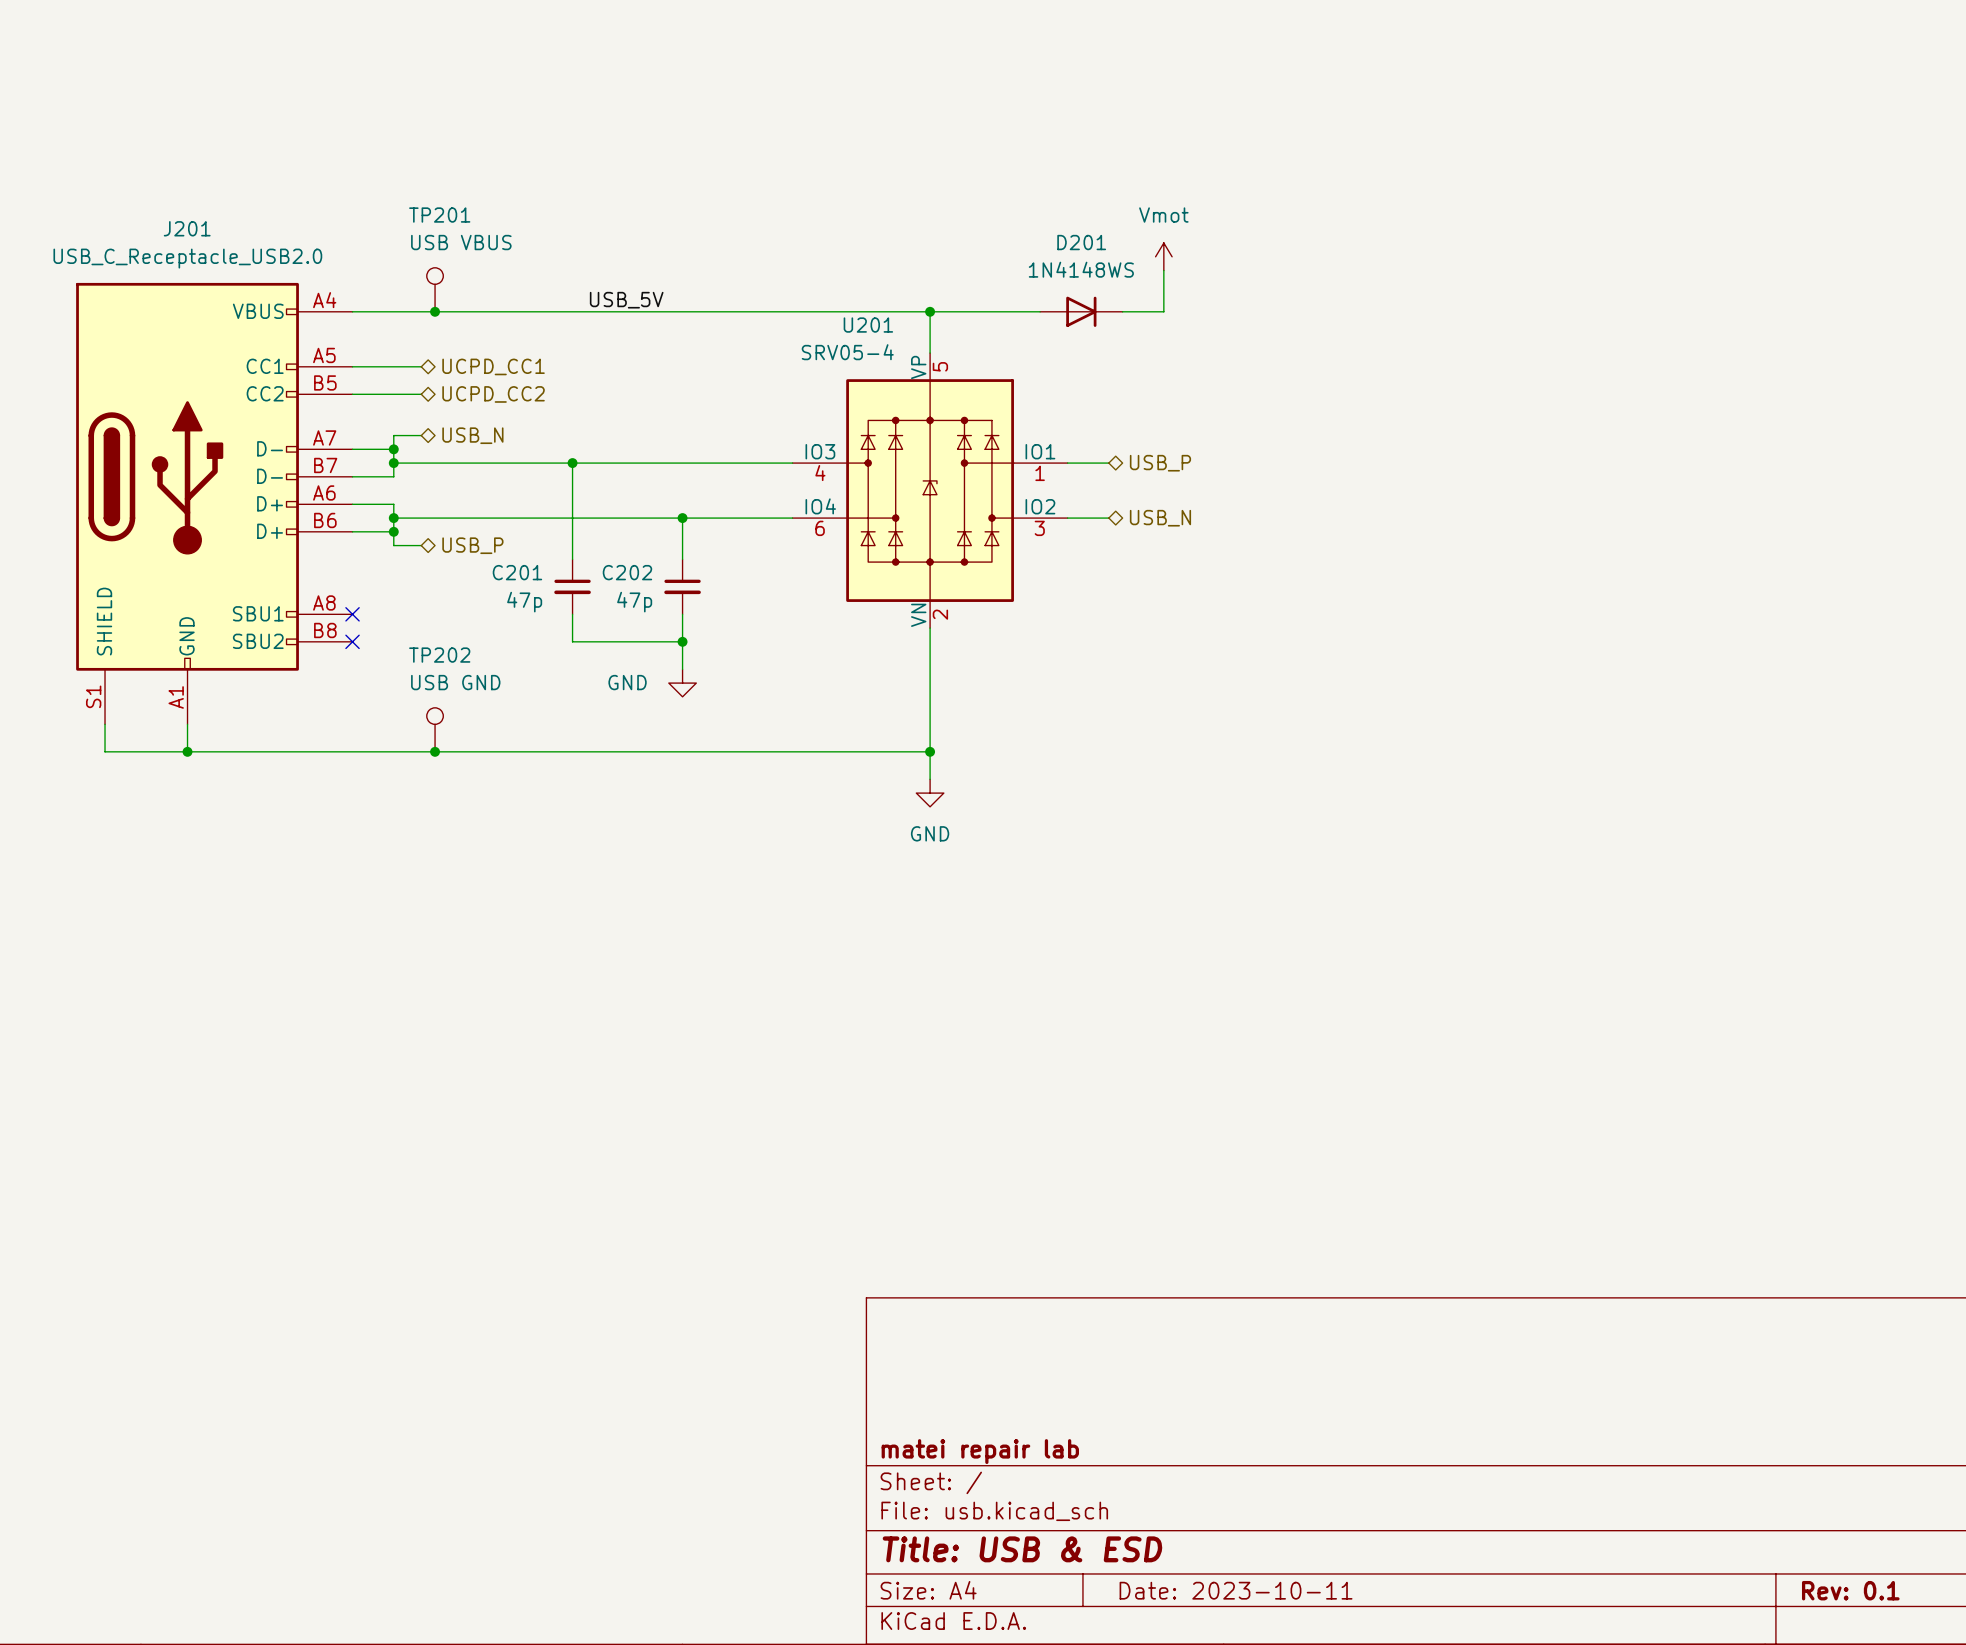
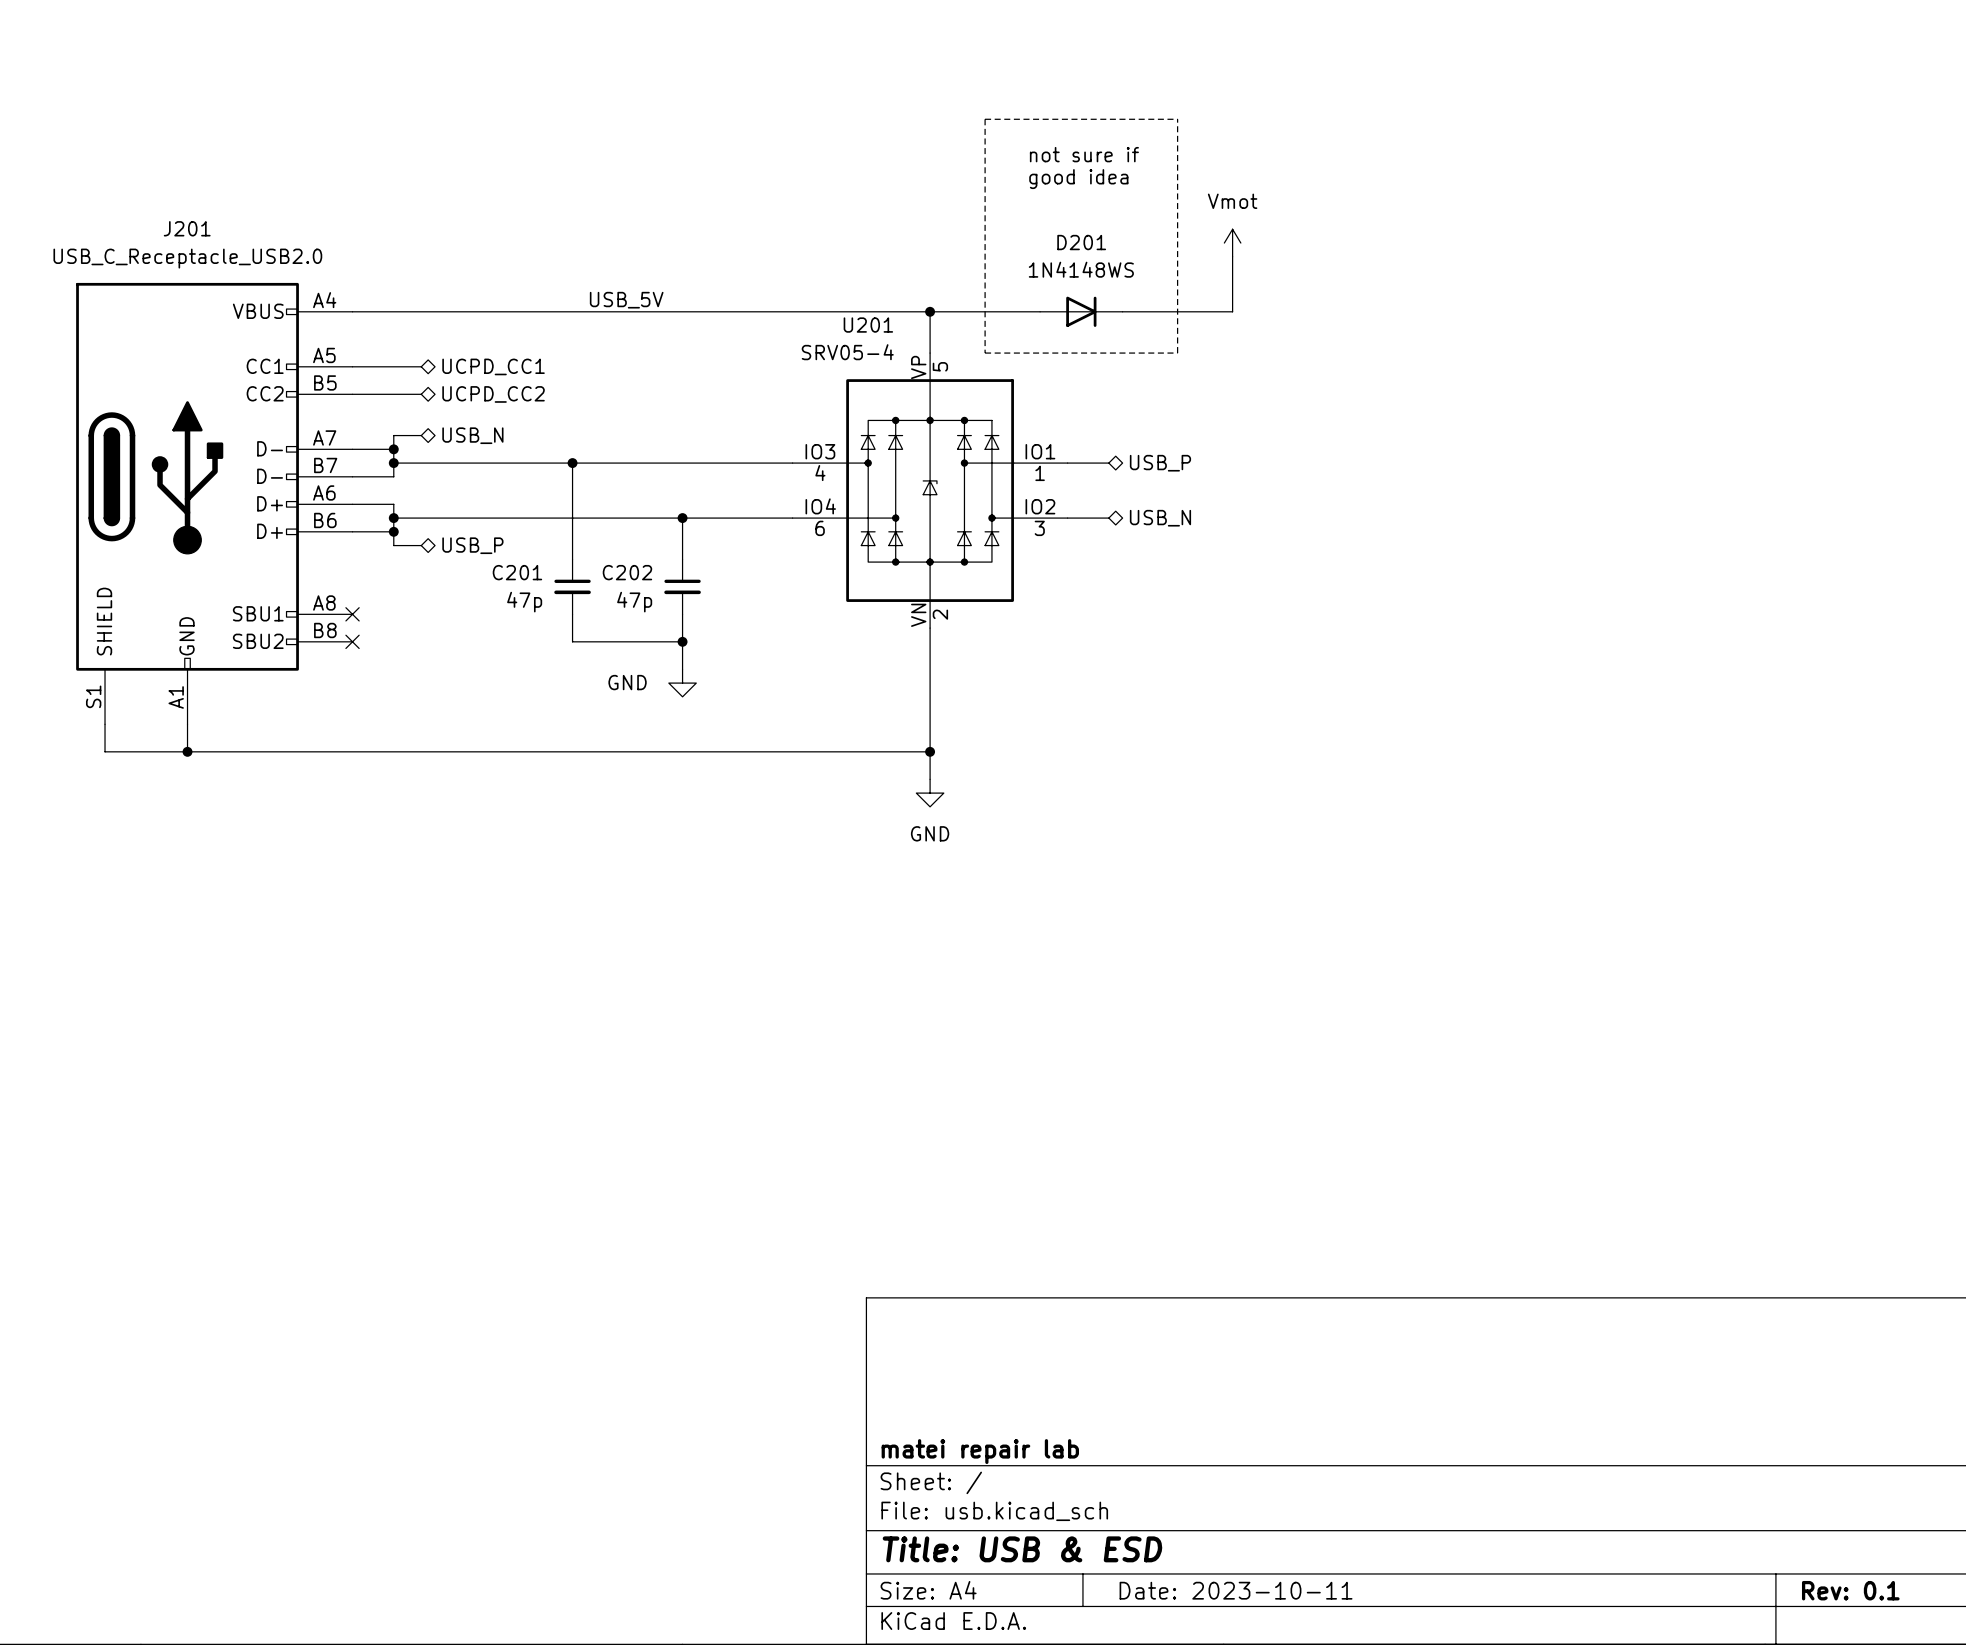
line: none -> (985, 119) (985, 353) (1177, 353) (1177, 119) (985, 119)
text: none -> not sure if (1084, 154)
text: none -> good idea (1078, 179)
power symbol position: Vmot (1163, 256) -> Vmot (1232, 243)
wire: (1163, 270) (1163, 311) -> (1232, 256) (1232, 311) (1163, 311)
TP201: USB VBUS (435, 289) -> none
junction: (435, 311) -> none
TP202: USB GND (435, 729) -> none
junction: (435, 751) -> none

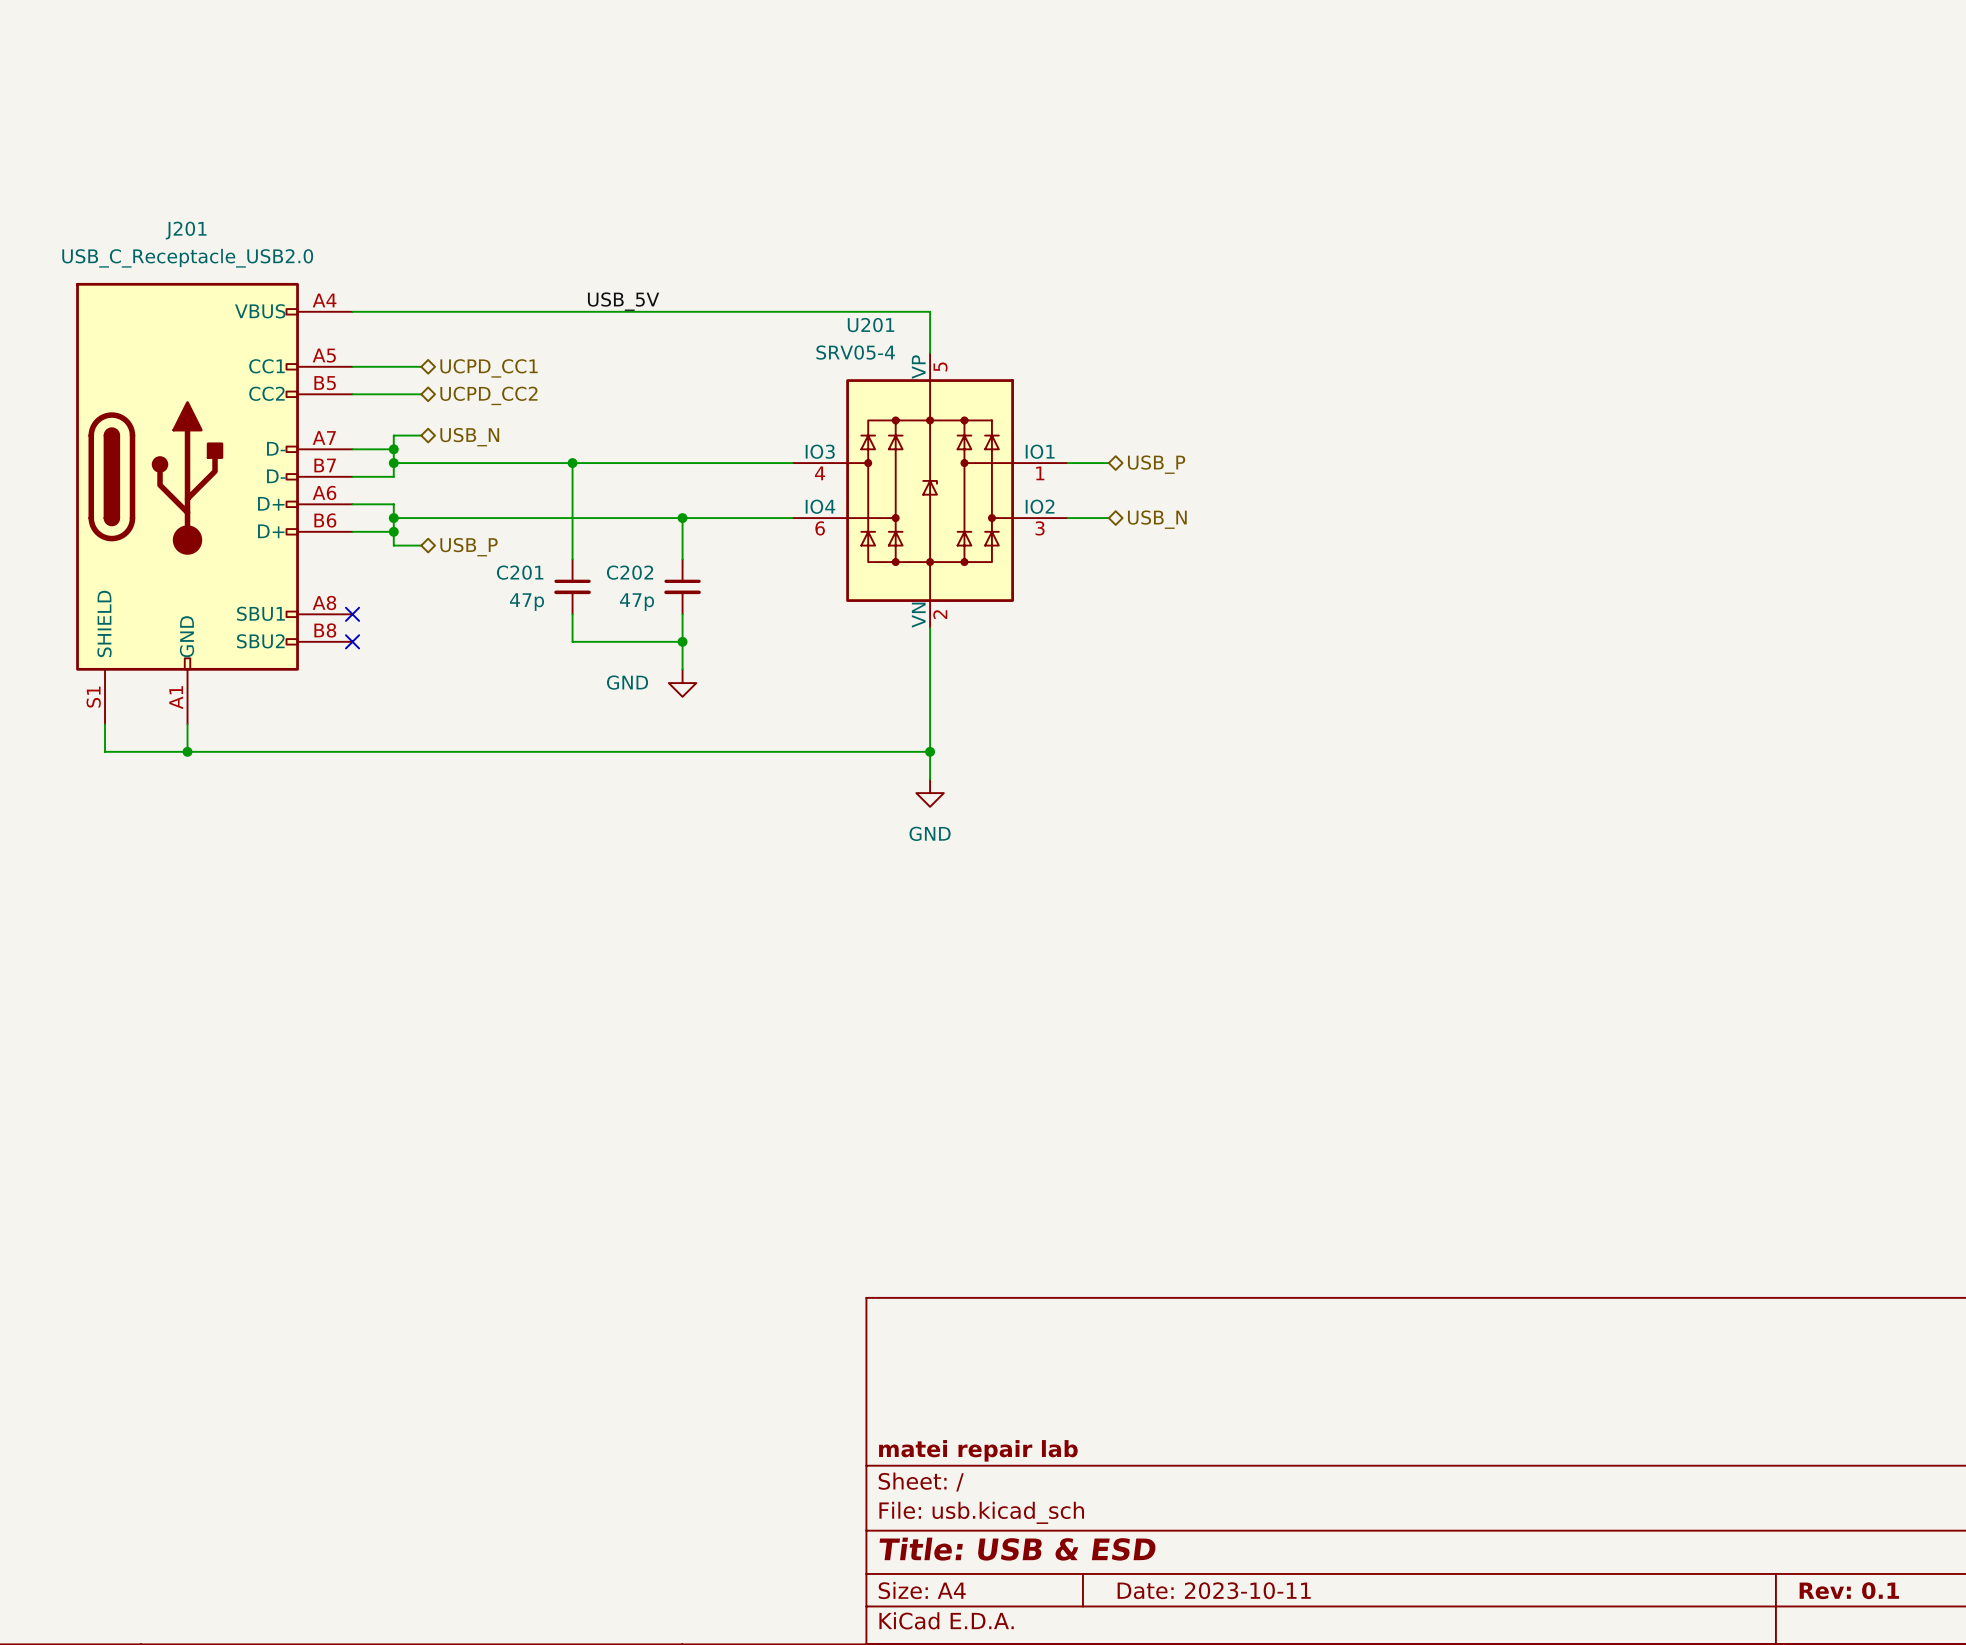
line: (985, 119) (985, 353) (1177, 353) (1177, 119) (985, 119) -> none
text: not sure if (1084, 154) -> none
text: good idea (1078, 179) -> none
power symbol: Vmot (1232, 243) -> none
wire: (1232, 256) (1232, 311) (1122, 311) -> none
wire: (930, 311) (1040, 311) -> none
junction: (930, 311) -> none
D201: 1N4148WS (1081, 311) -> none

